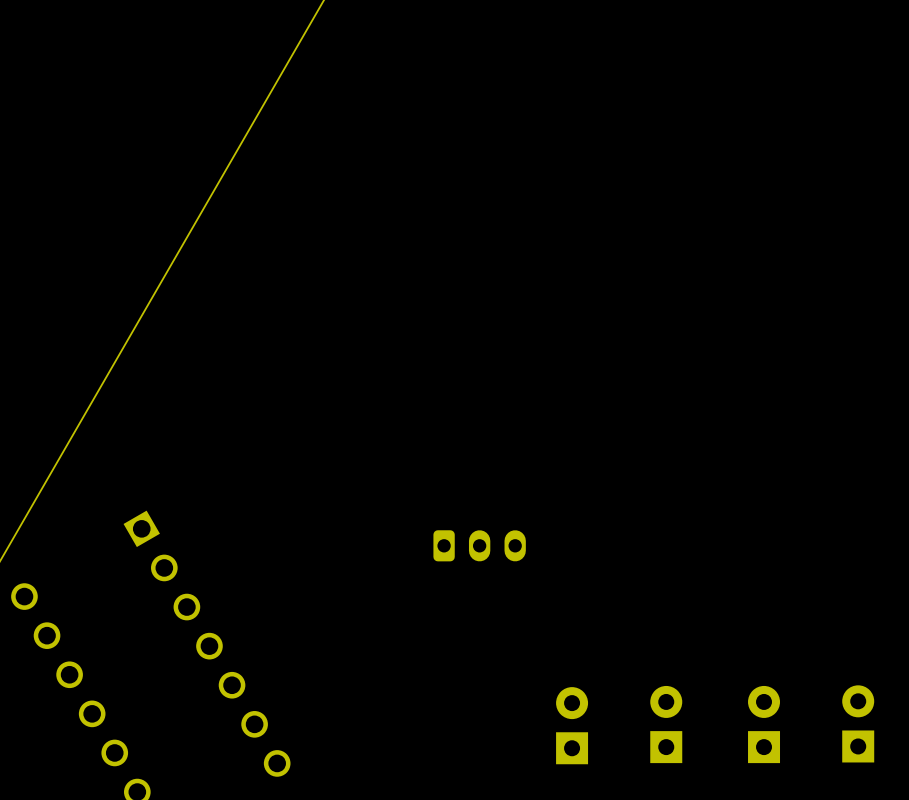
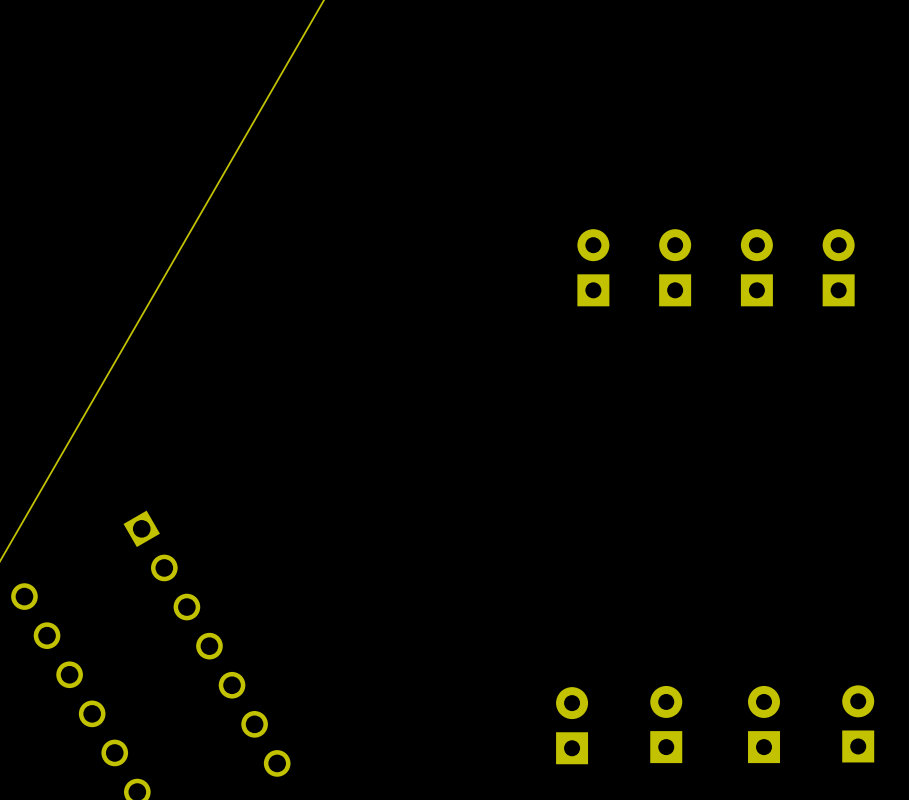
part: none -> (593, 267)
part: none -> (675, 267)
part: none -> (756, 267)
part: none -> (838, 267)
part: (479, 545) -> none

